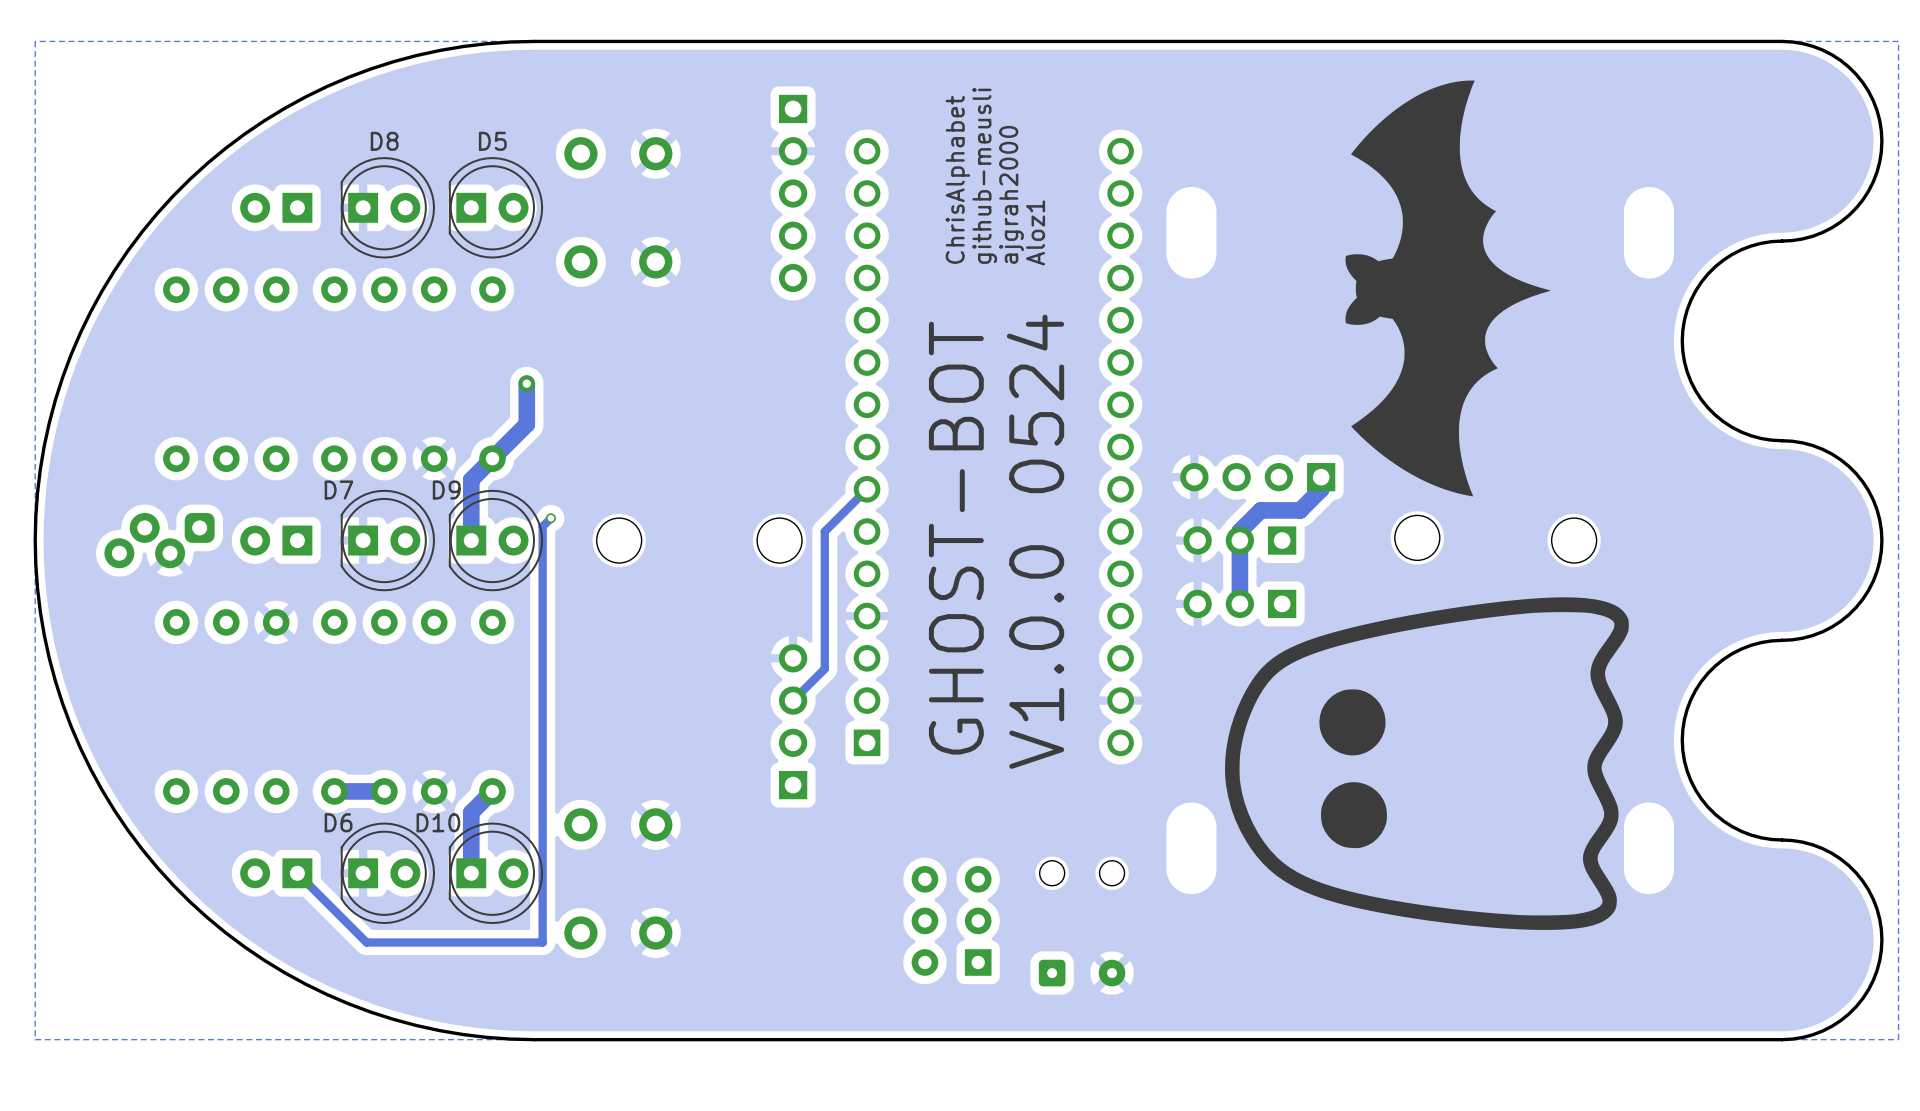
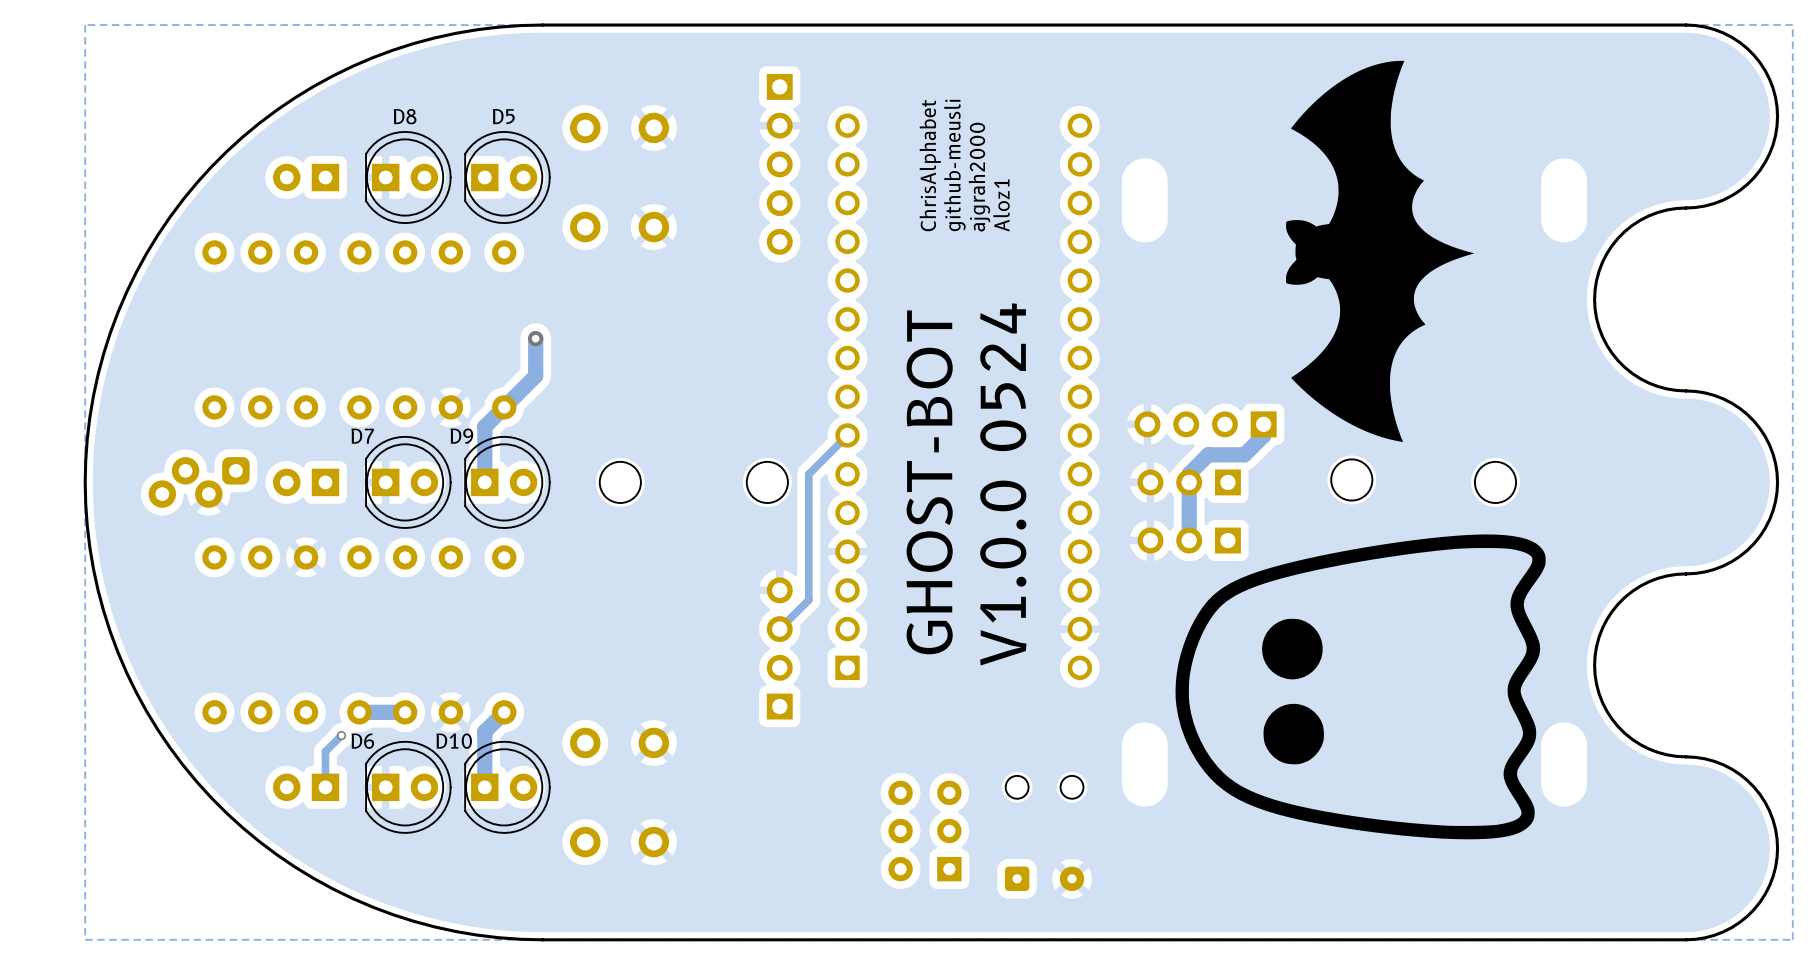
track: (550, 518) (542, 526) (542, 942) (366, 942) (297, 873) -> (341, 735) (325, 751) (325, 787)
via: (550, 518) -> none
via: none -> (341, 735)

